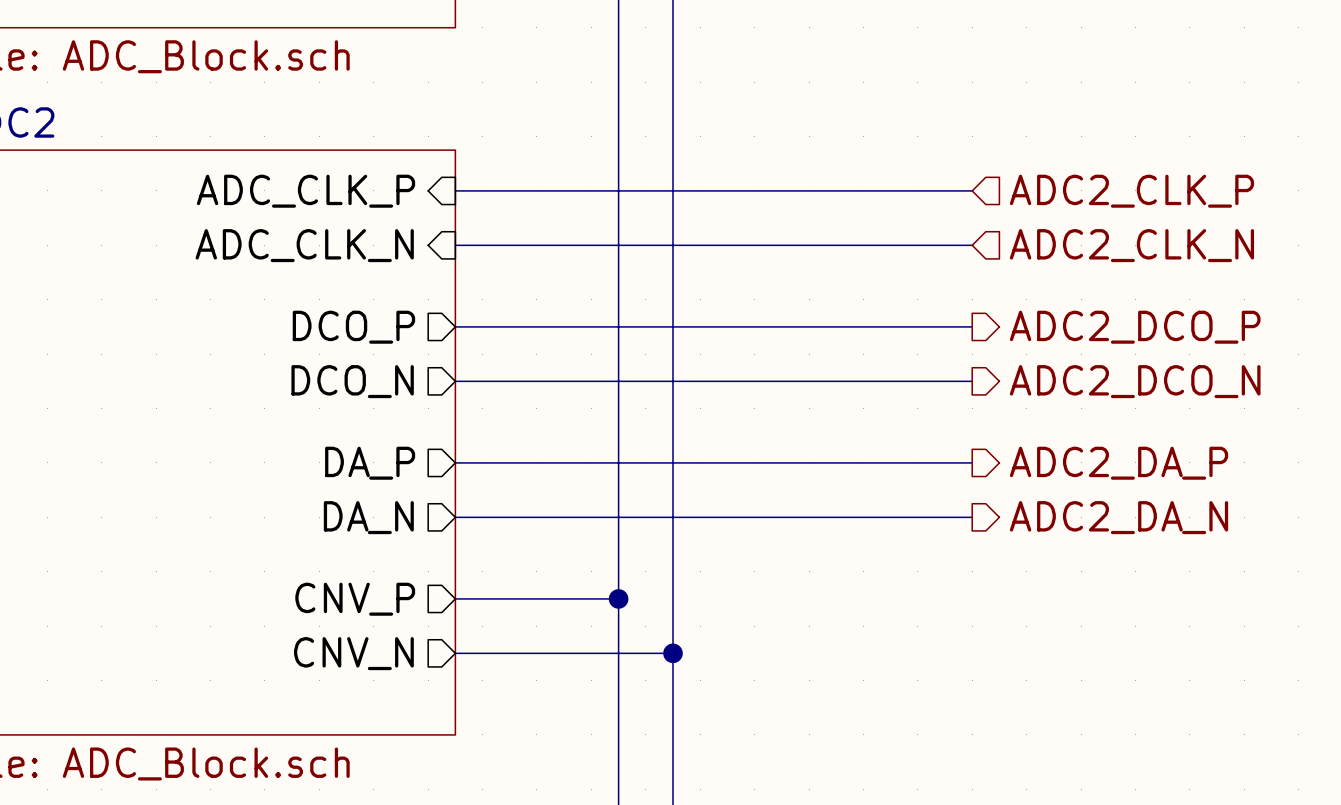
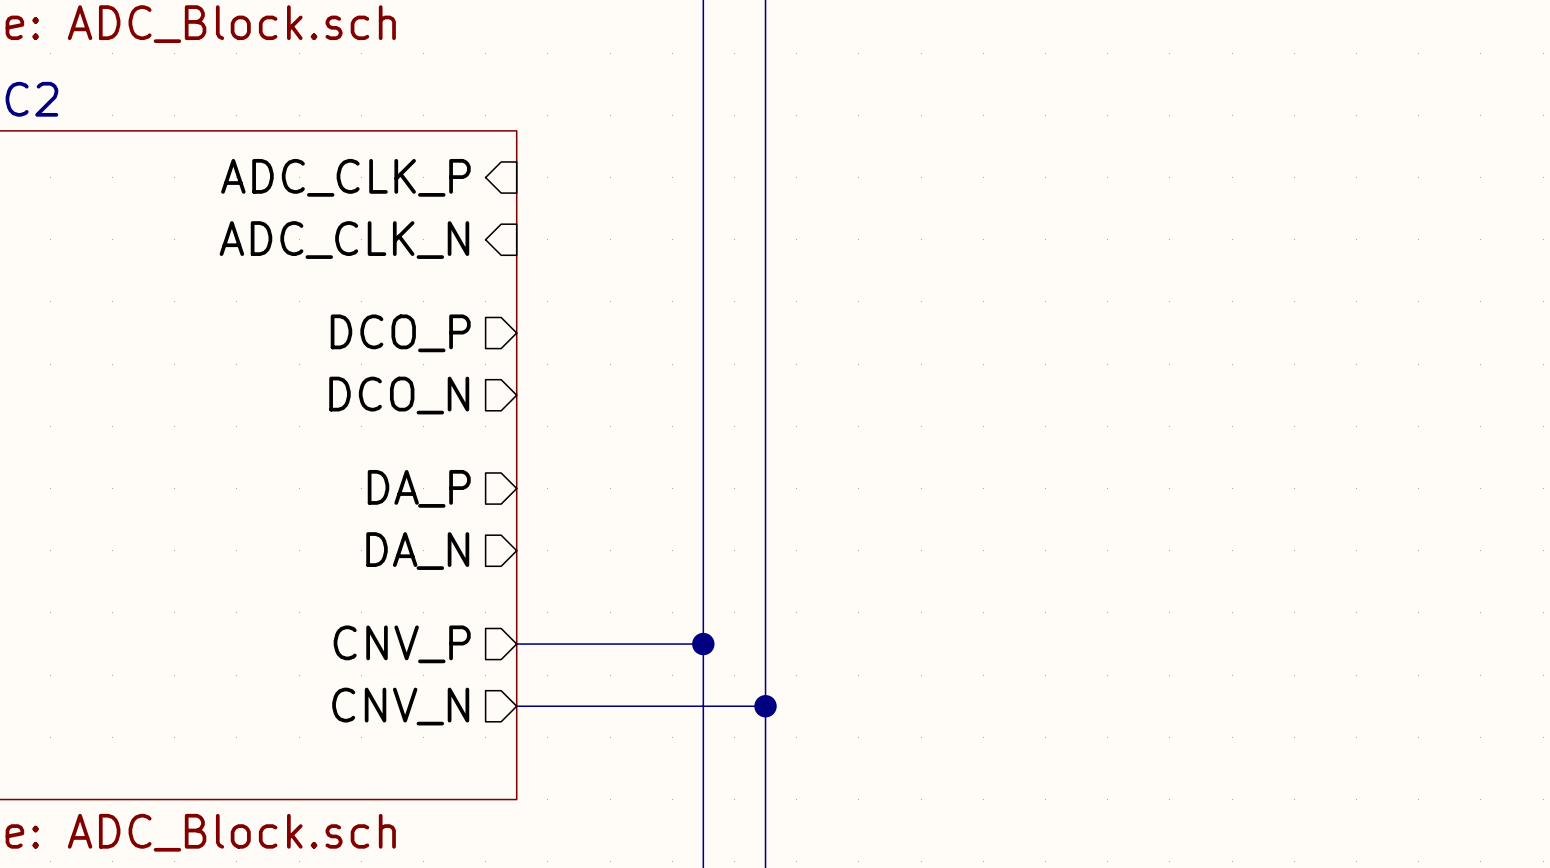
wire: (455, 190) (972, 190) -> none
hierarchical label: ADC2_CLK_P (1131, 191) -> none
wire: (455, 245) (972, 245) -> none
hierarchical label: ADC2_CLK_N (1131, 245) -> none
wire: (455, 326) (972, 326) -> none
hierarchical label: ADC2_DCO_P (1135, 327) -> none
wire: (455, 381) (972, 381) -> none
hierarchical label: ADC2_DCO_N (1135, 381) -> none
wire: (455, 462) (972, 462) -> none
hierarchical label: ADC2_DA_P (1119, 463) -> none
wire: (455, 517) (972, 517) -> none
hierarchical label: ADC2_DA_N (1119, 517) -> none

